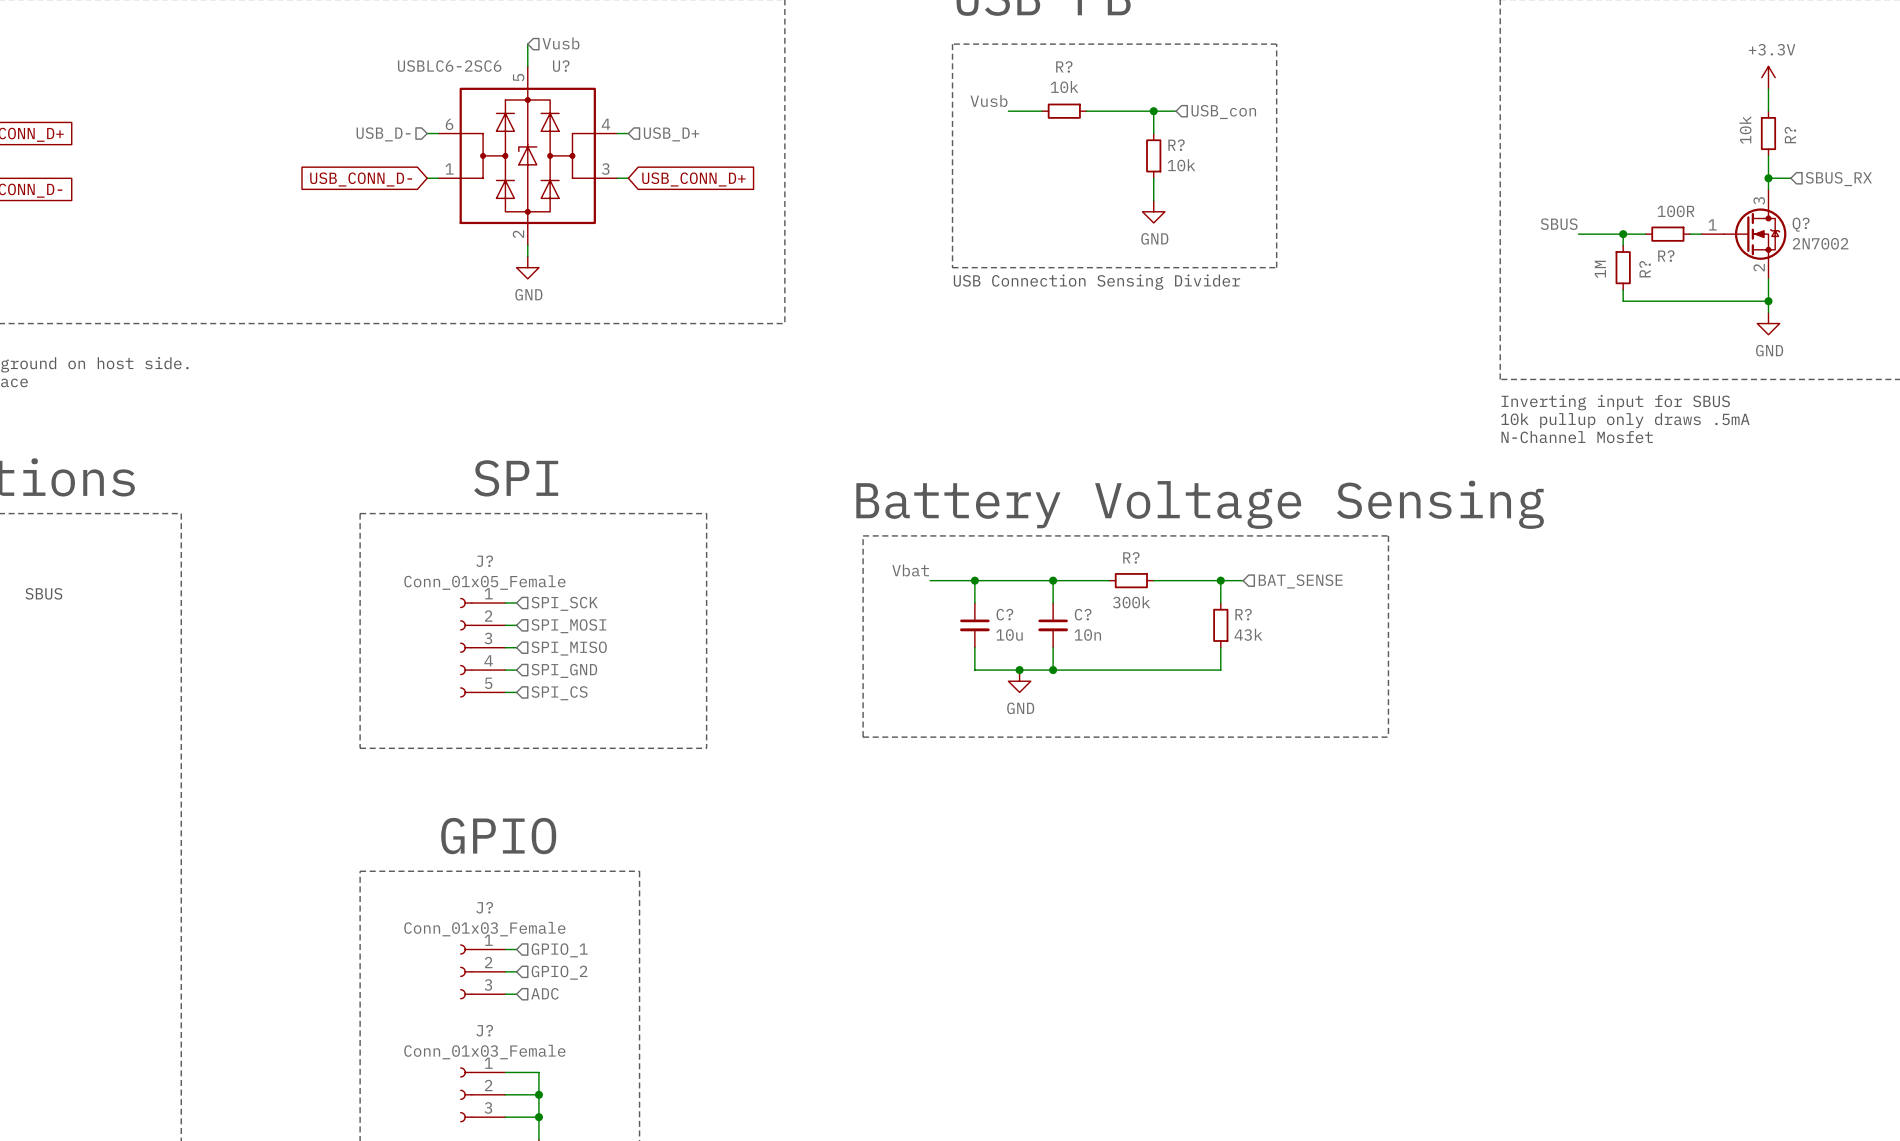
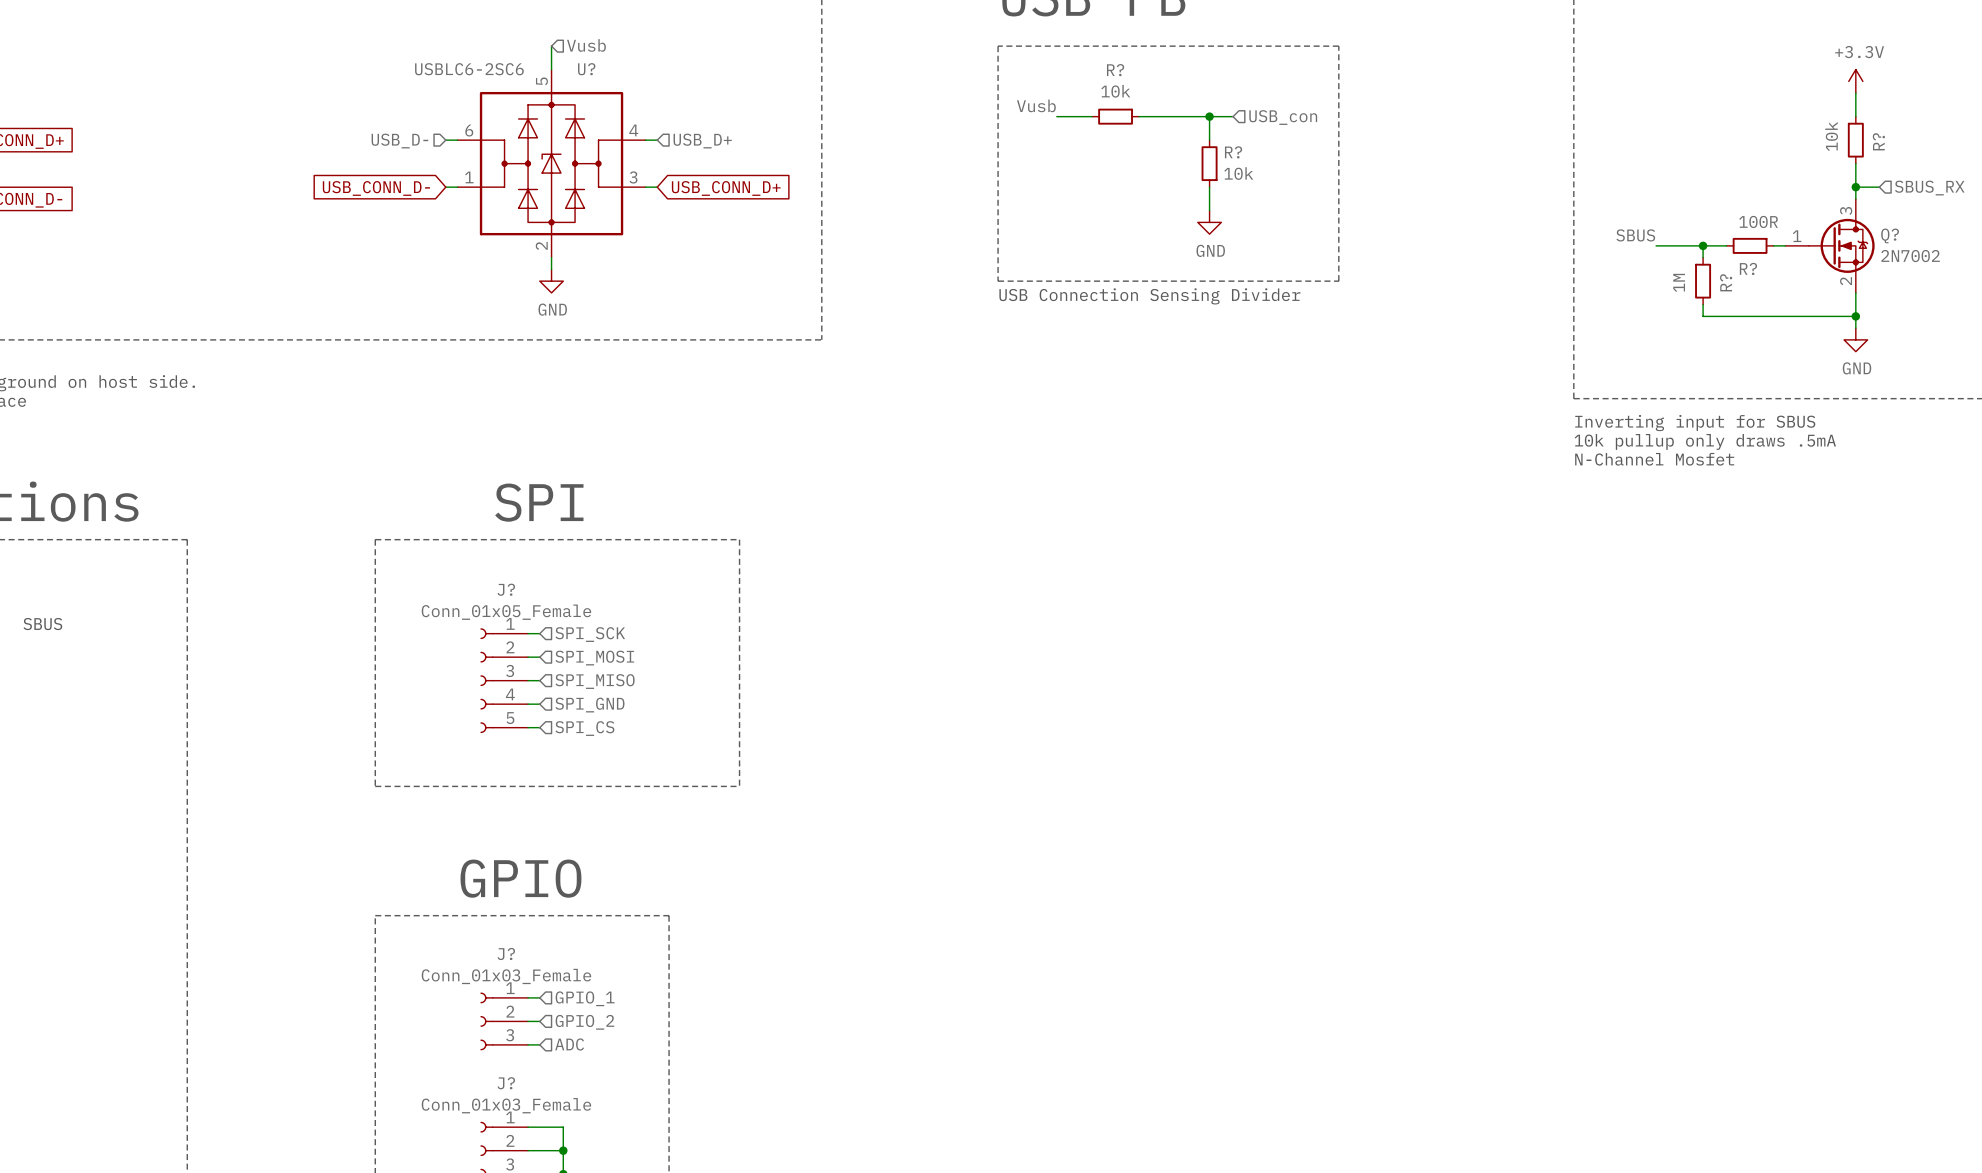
text: Battery Voltage Sensing (1200, 504) -> none
line: (863, 535) (1388, 535) (1388, 737) (863, 737) (863, 535) -> none
label: Vbat (910, 570) -> none
wire: (930, 580) (1109, 580) -> none
wire: (974, 580) (974, 603) -> none
junction: (974, 580) -> none
wire: (1053, 580) (1053, 603) -> none
junction: (1053, 580) -> none
R?: 300k (1131, 580) -> none
wire: (1153, 580) (1243, 580) -> none
wire: (1220, 580) (1220, 603) -> none
junction: (1220, 580) -> none
hierarchical label: BAT_SENSE (1300, 581) -> none
C?: 10u (974, 625) -> none
C?: 10n (1053, 625) -> none
R?: 43k (1220, 625) -> none
wire: (974, 647) (974, 670) (1220, 670) (1220, 647) -> none
wire: (1053, 647) (1053, 670) -> none
junction: (1019, 670) -> none
junction: (1053, 670) -> none
power symbol: GND (1019, 681) -> none

